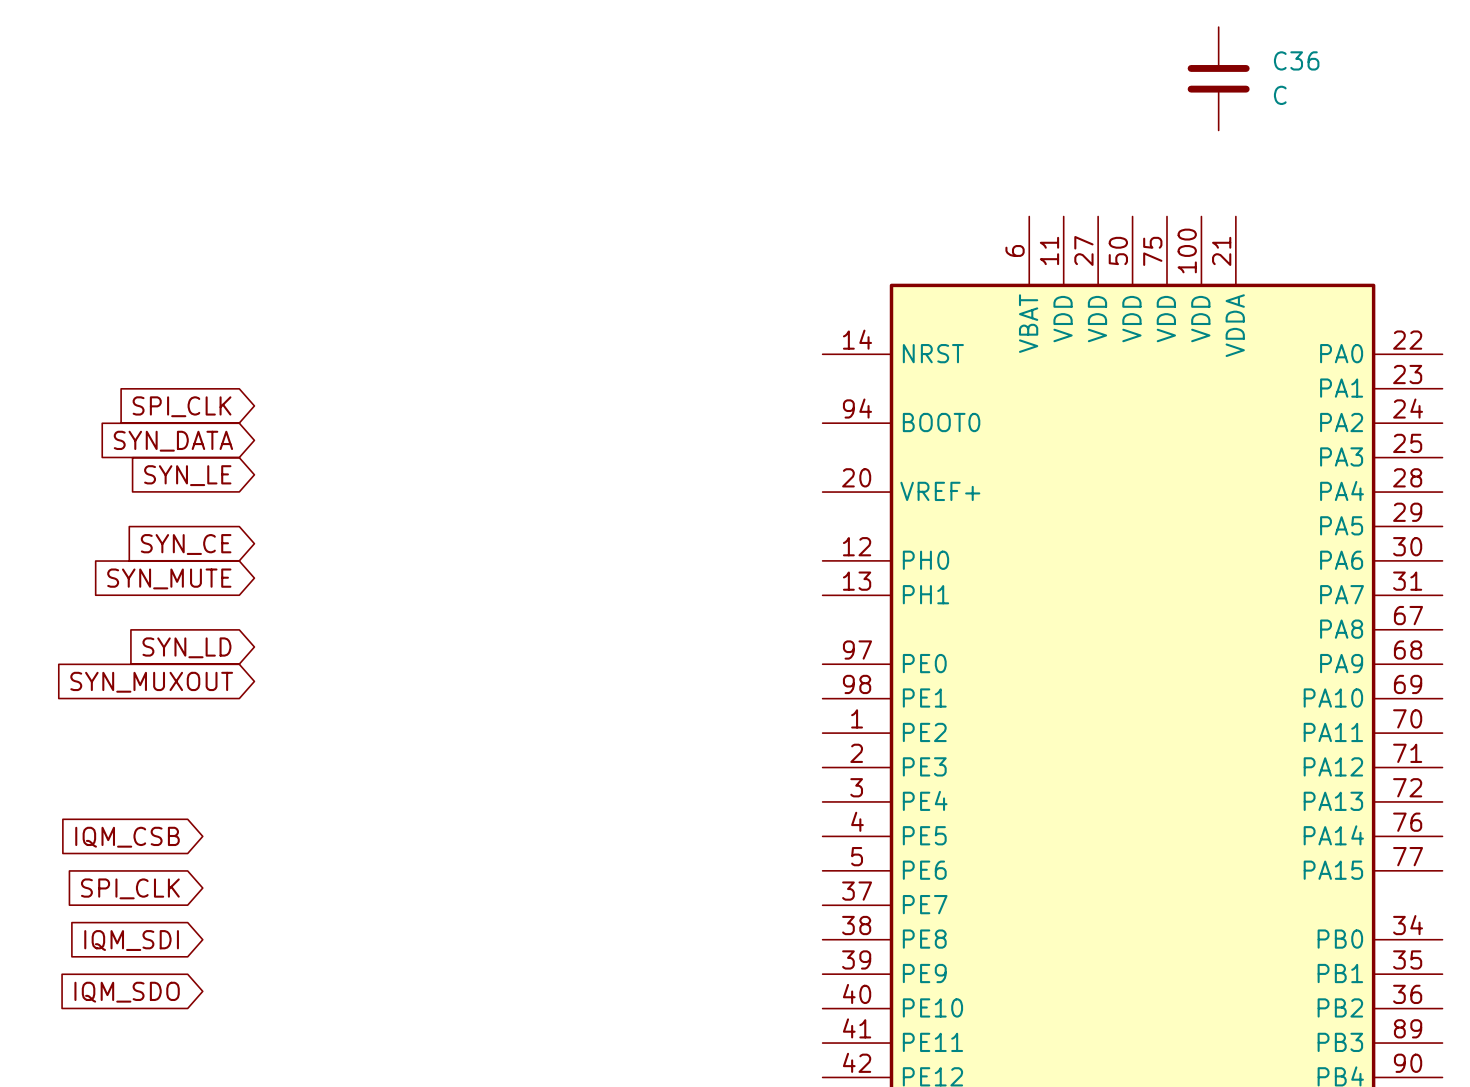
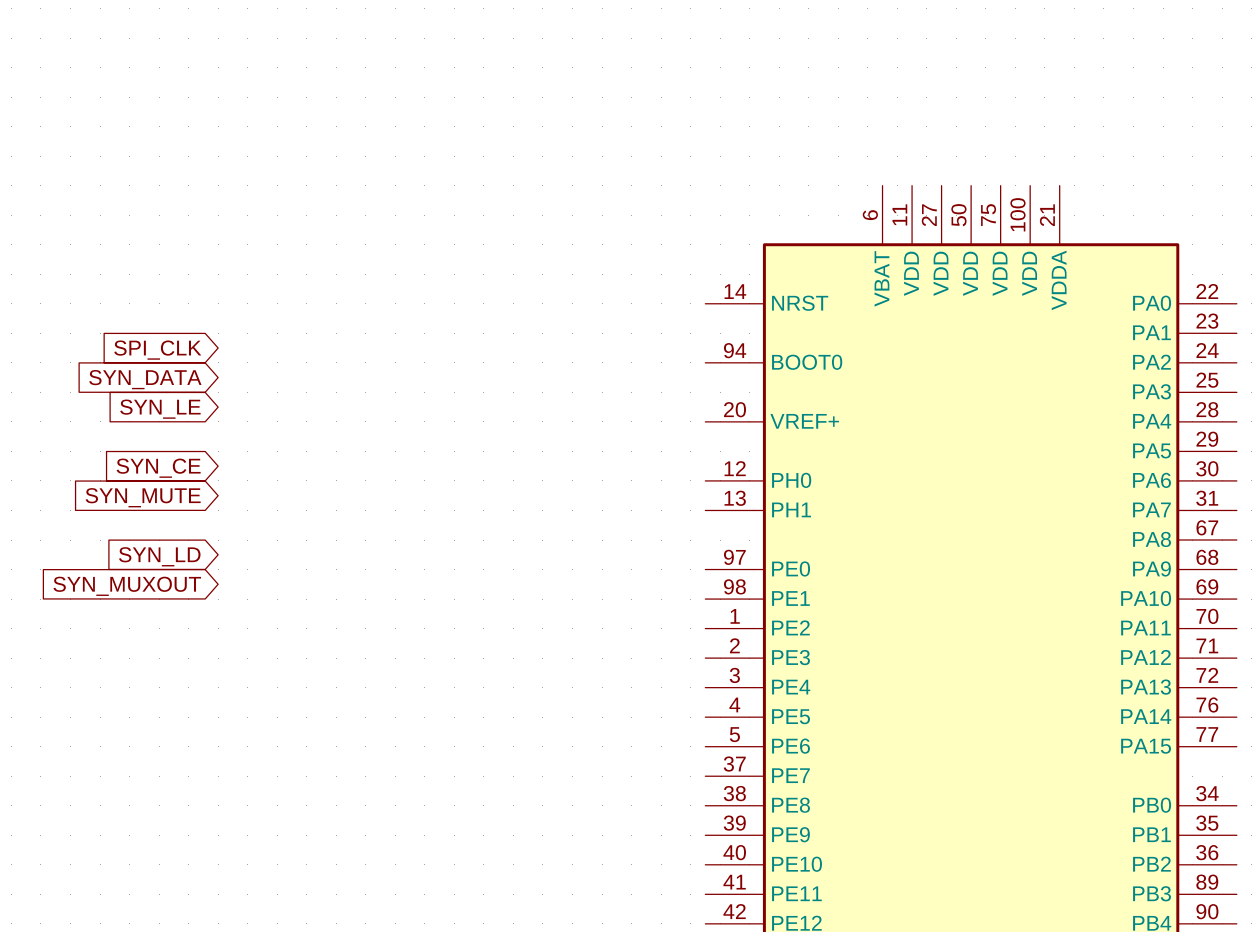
C36: C (1218, 78) -> none
global label: IQM_CSB (127, 837) -> none
global label: SPI_CLK (130, 888) -> none
global label: IQM_SDI (131, 940) -> none
global label: IQM_SDO (127, 992) -> none

